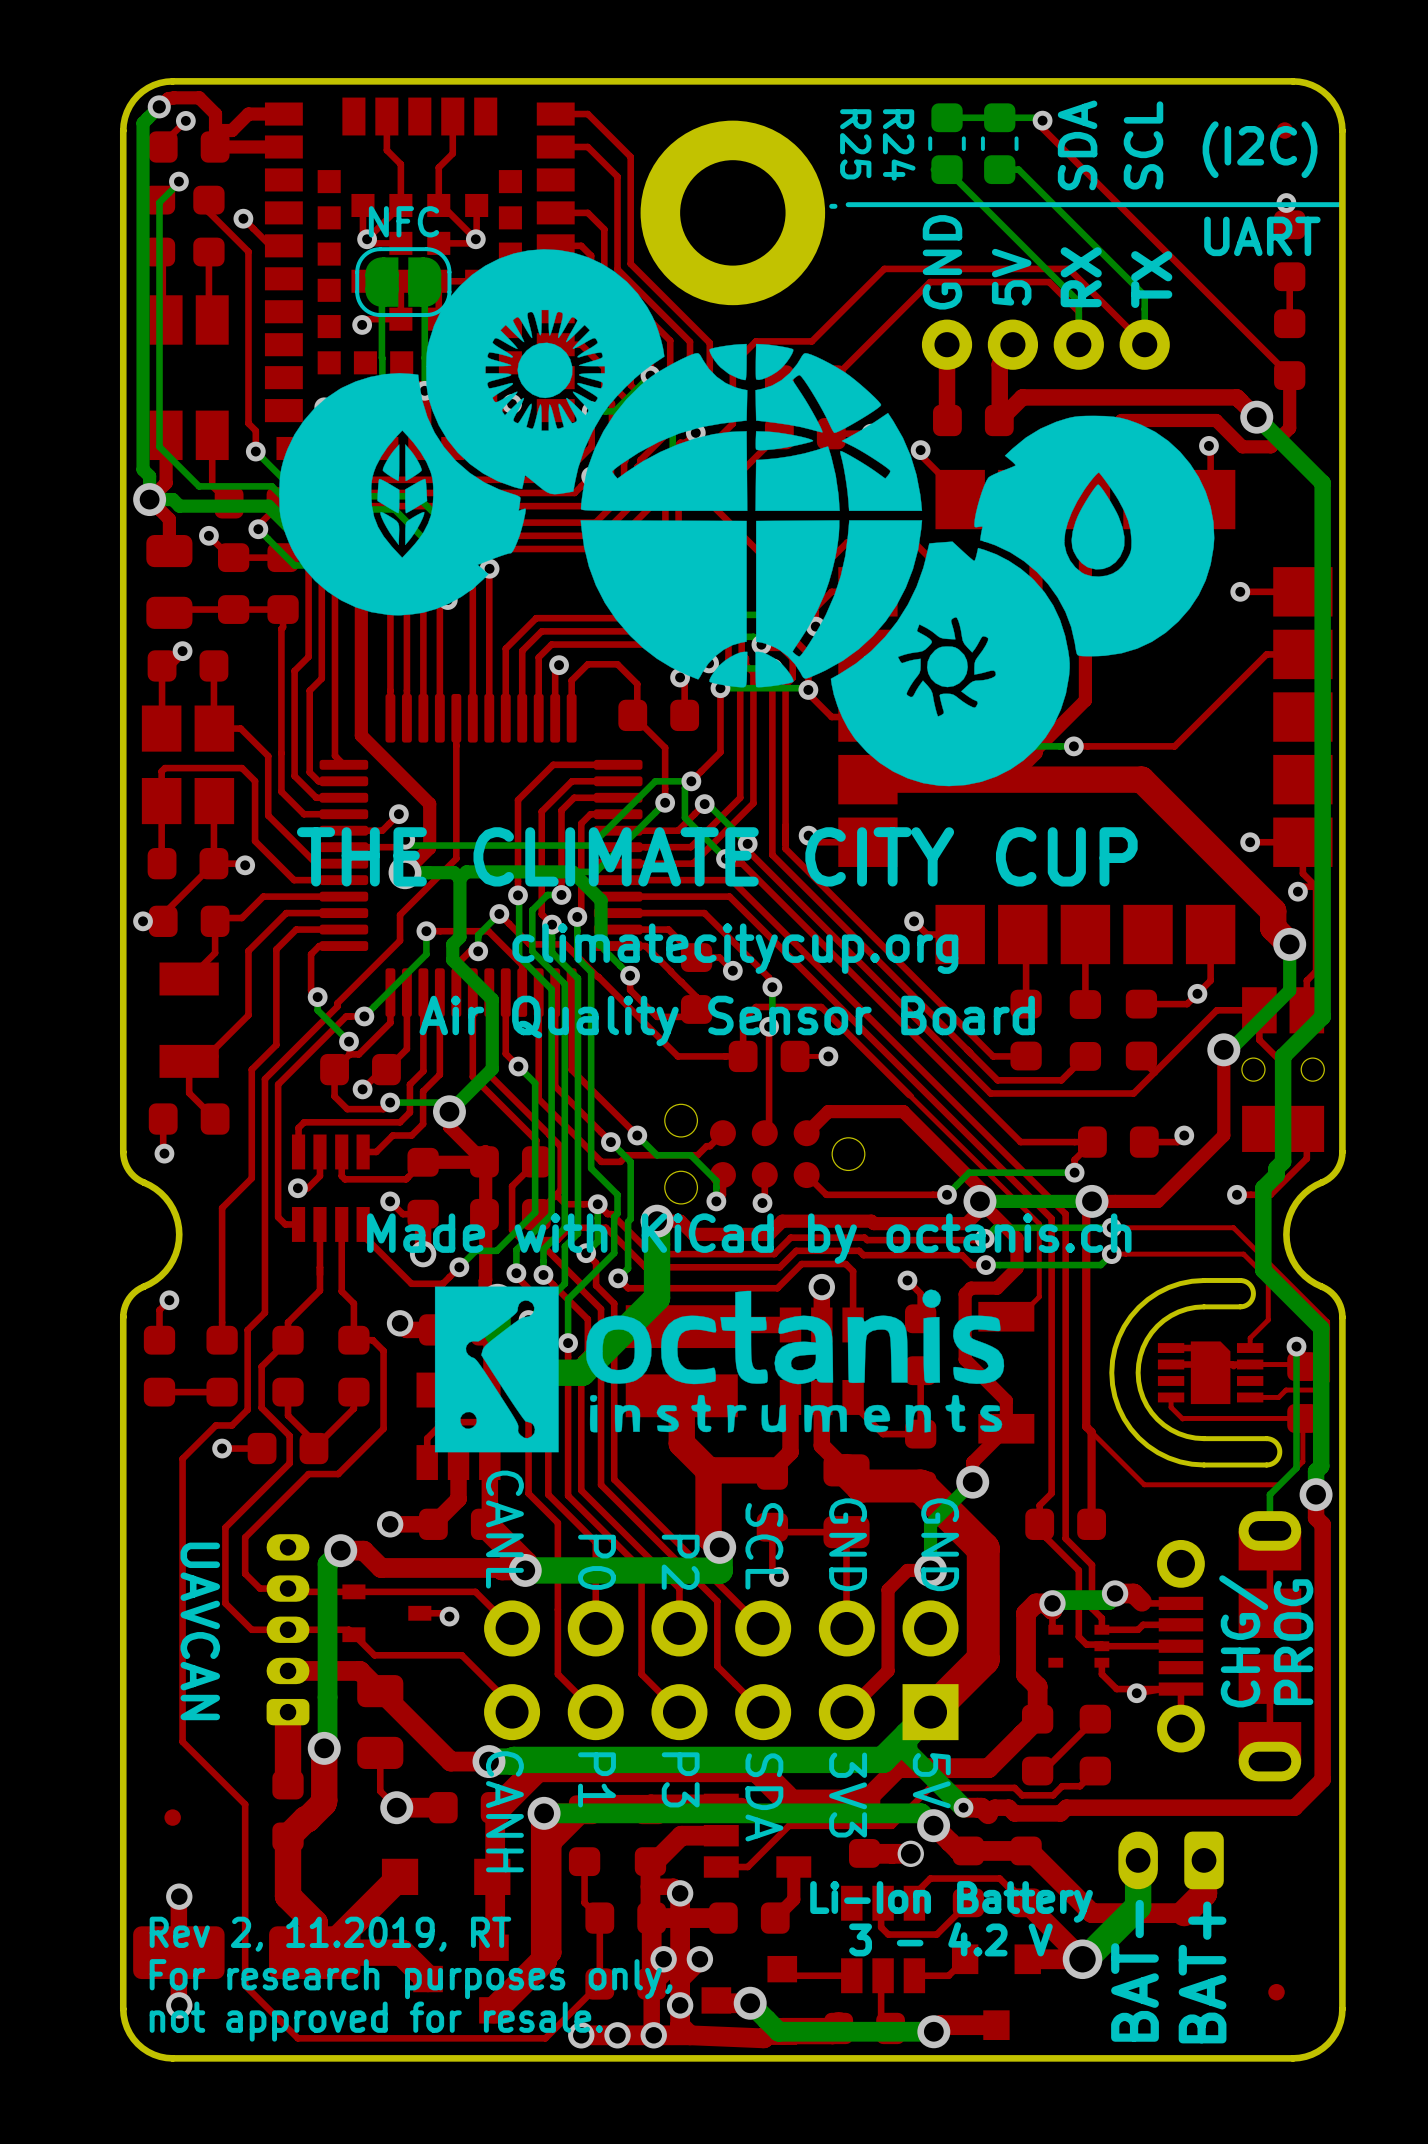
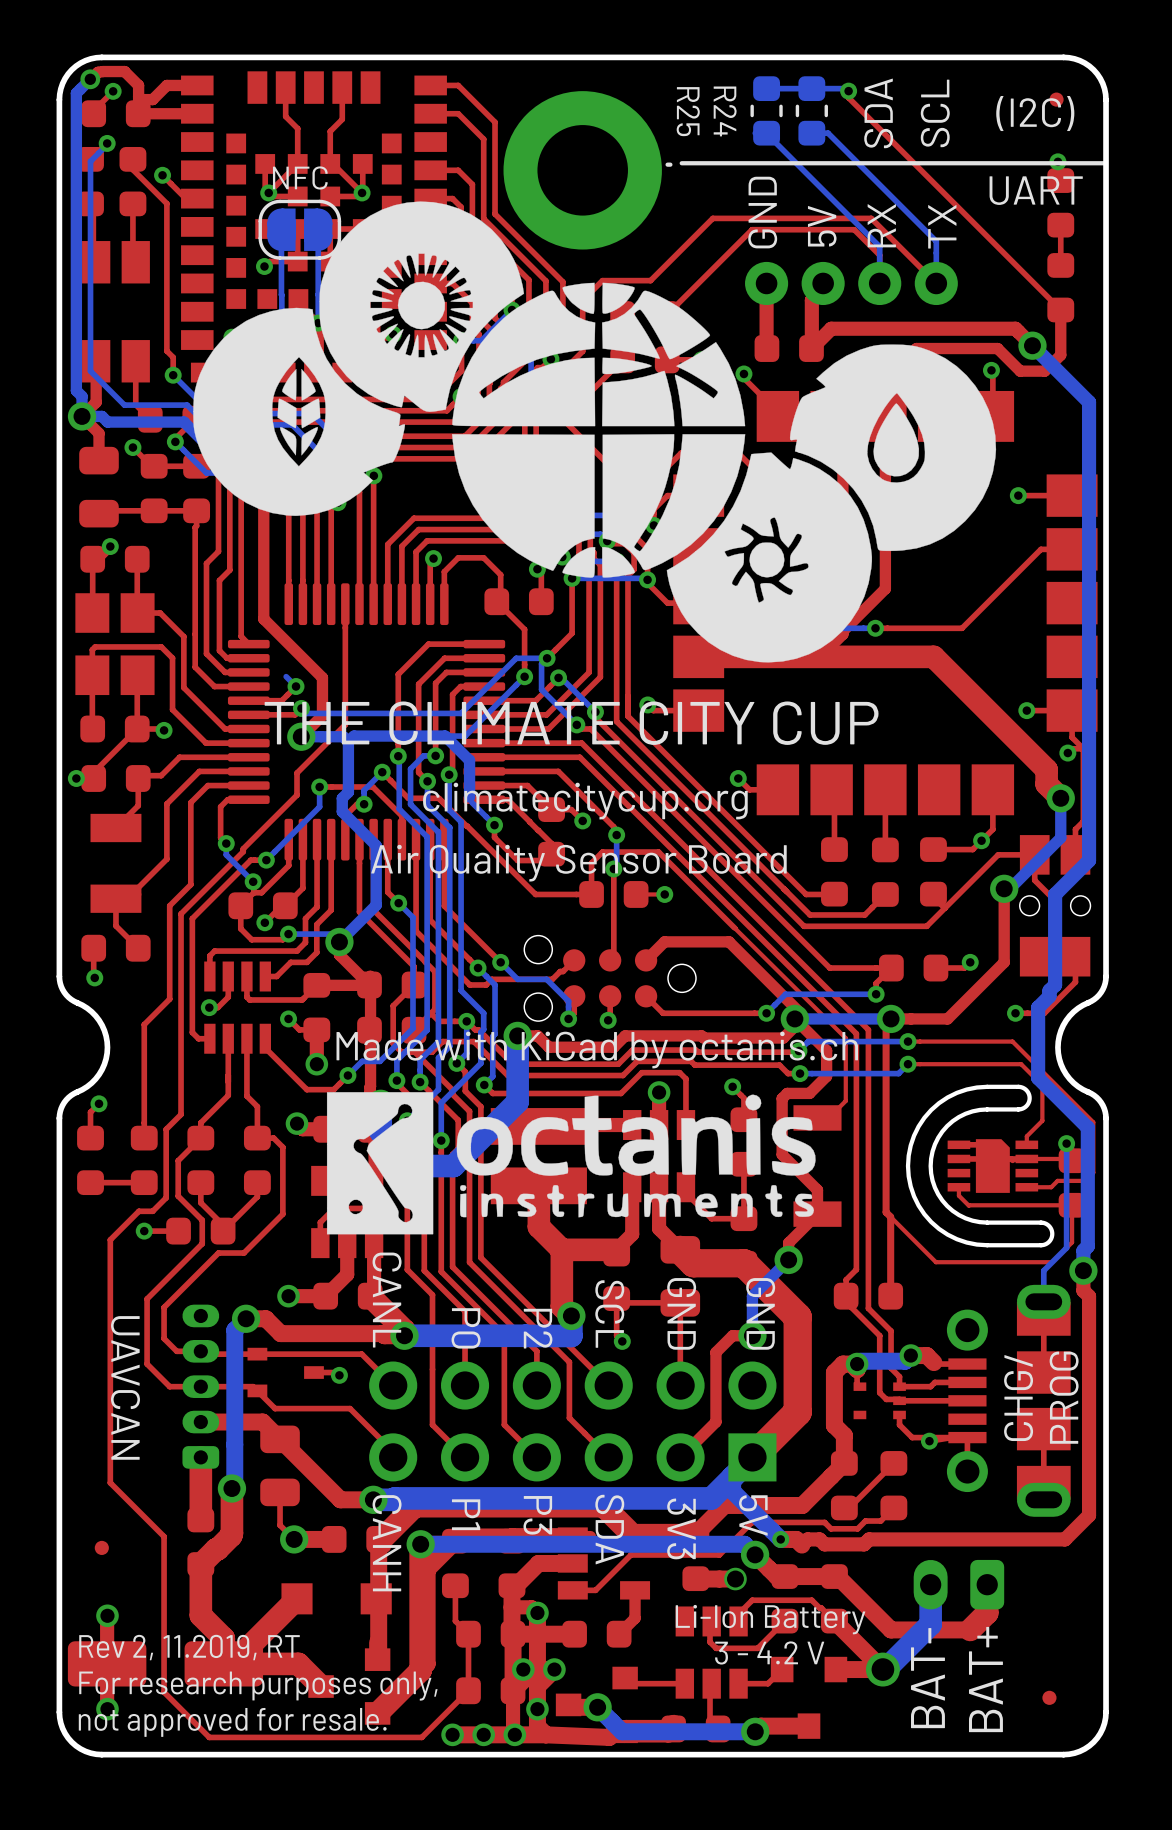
bottom track: none -> (286, 676) (296, 686)

